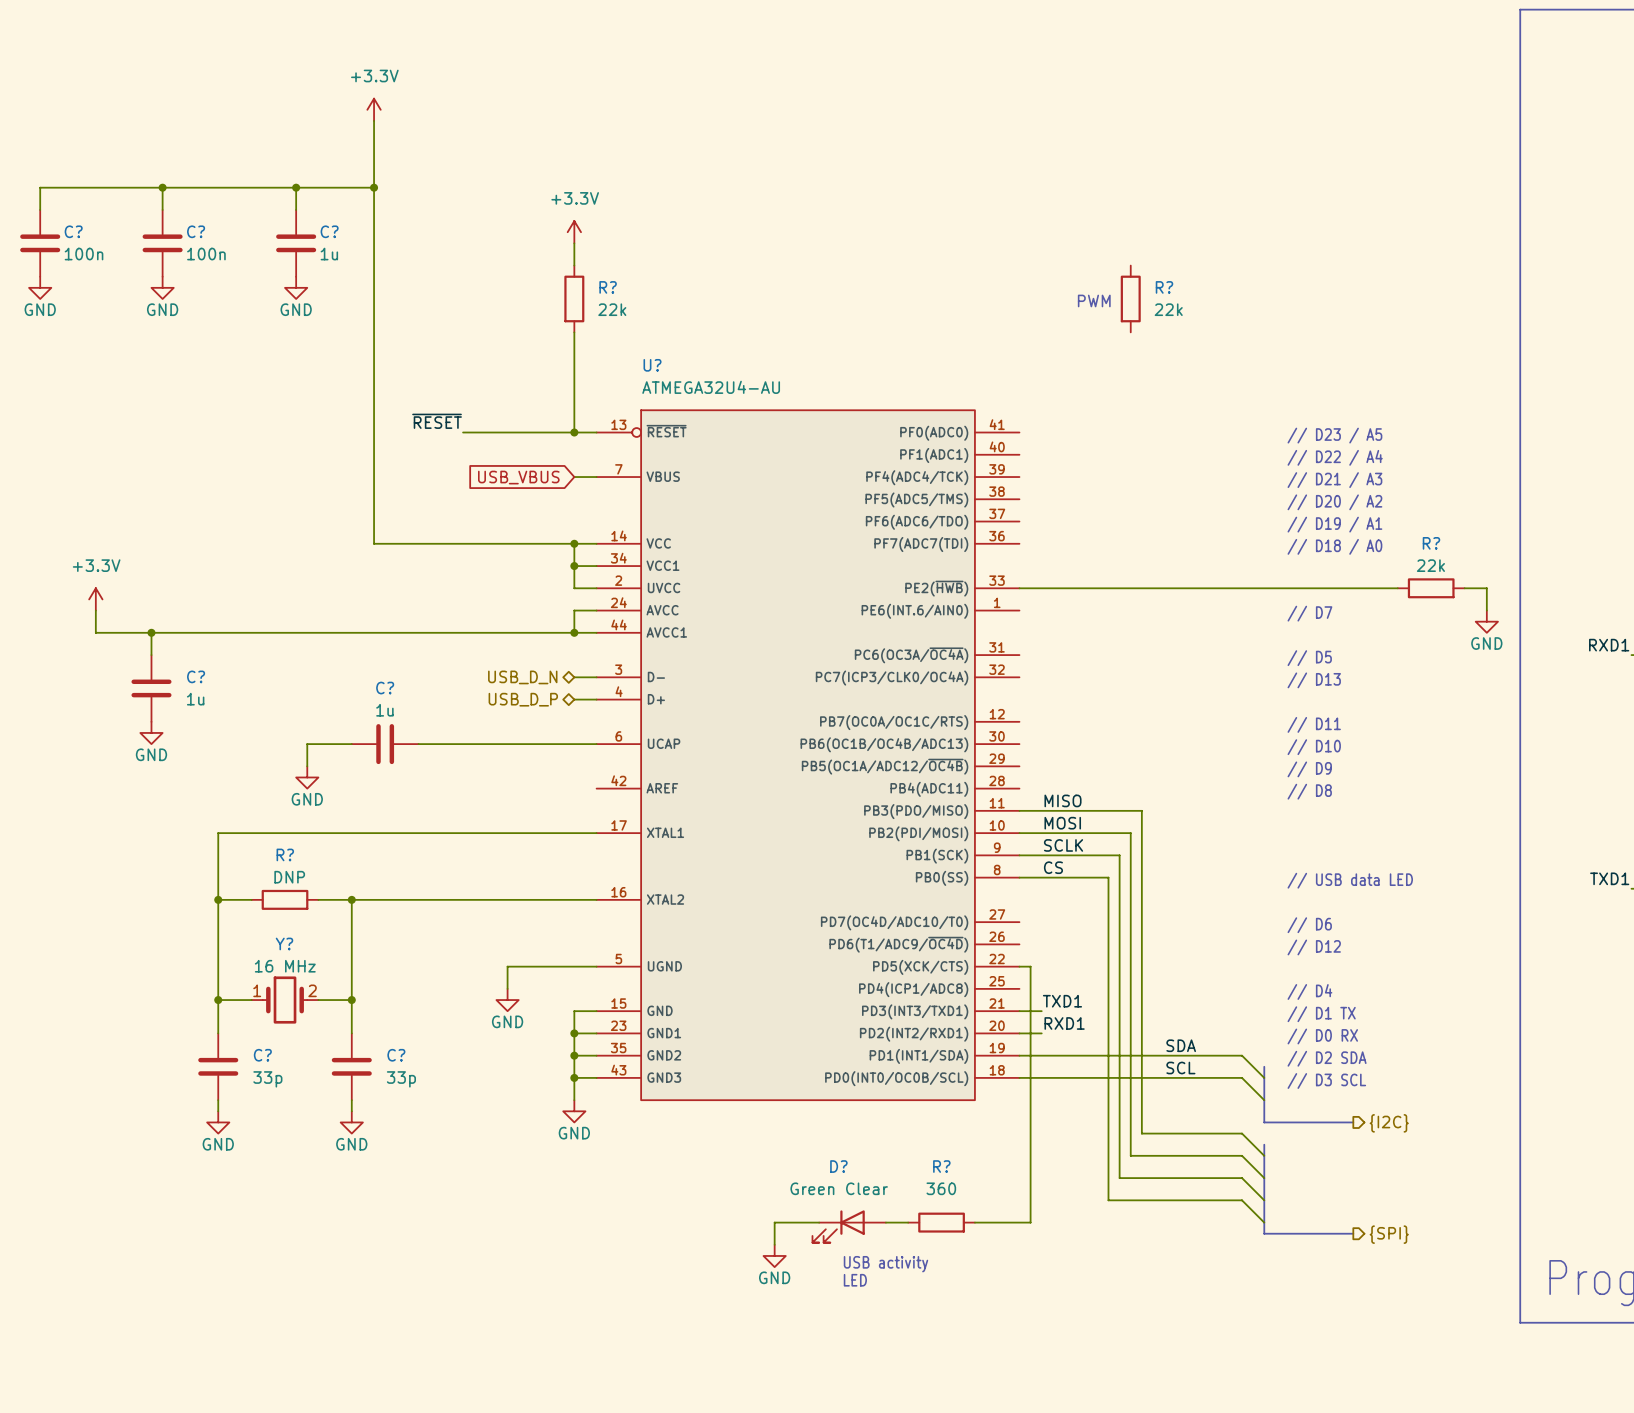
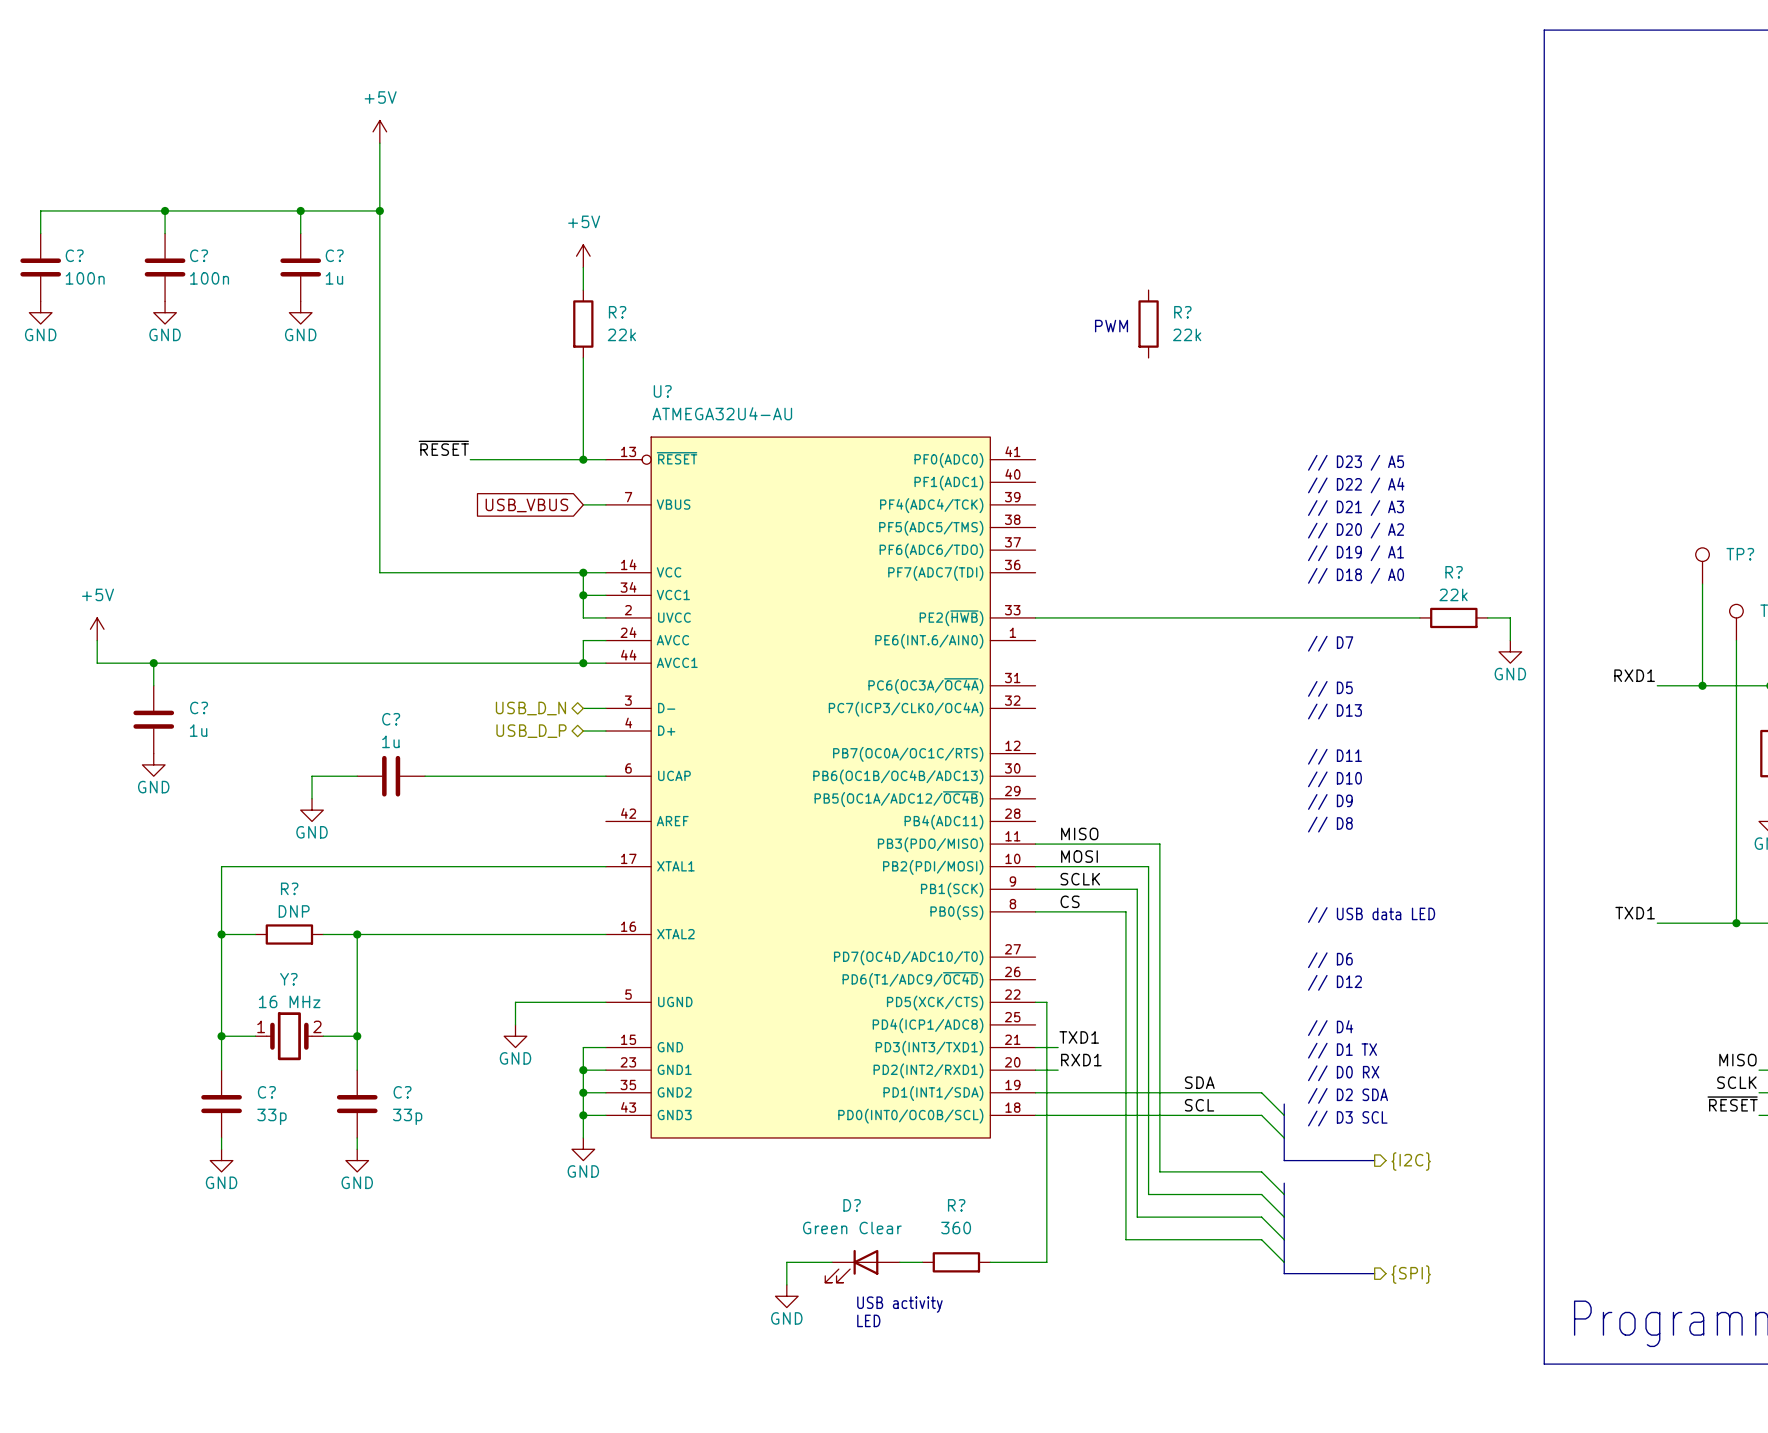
power symbol: +3.3V (374, 109) -> +5V (379, 131)
power symbol: +3.3V (574, 232) -> +5V (583, 256)
power symbol: +3.3V (95, 599) -> +5V (97, 629)

